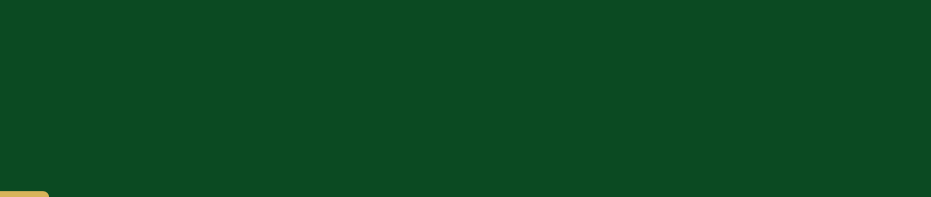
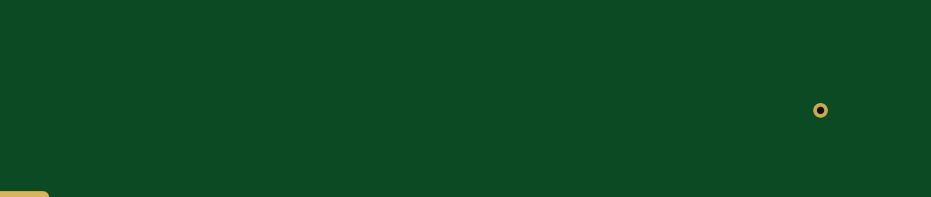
via: none -> (820, 110)

